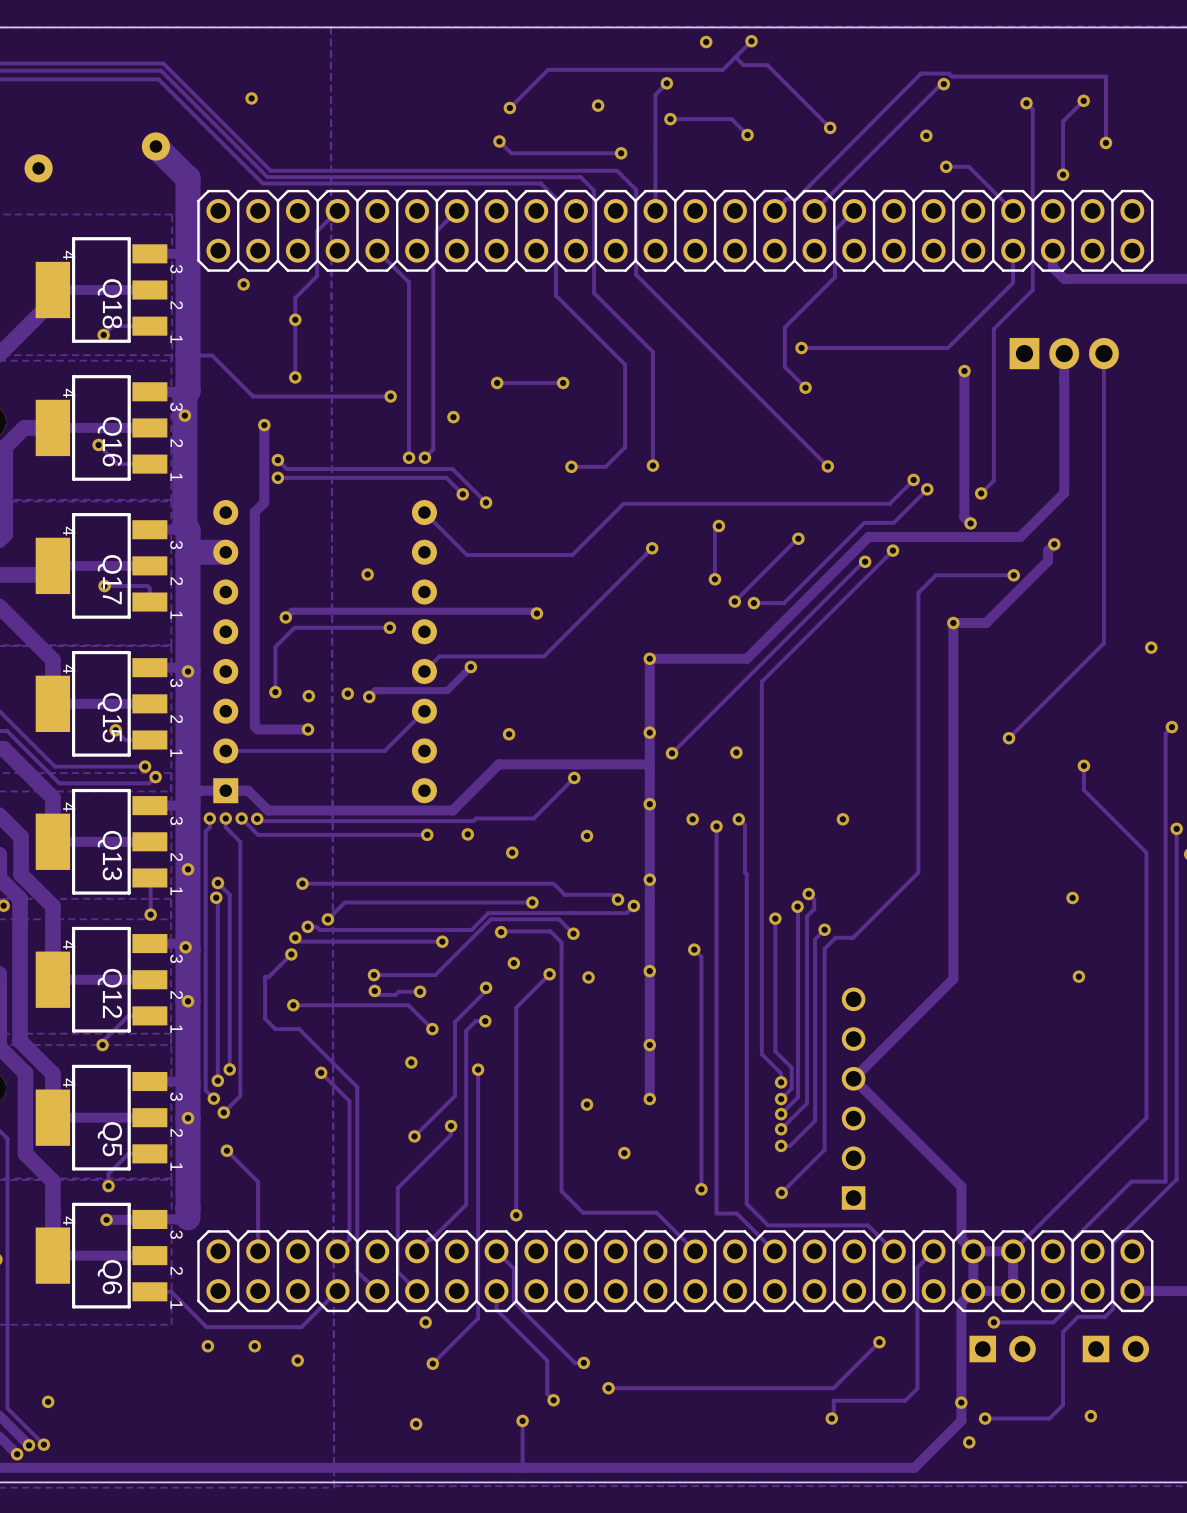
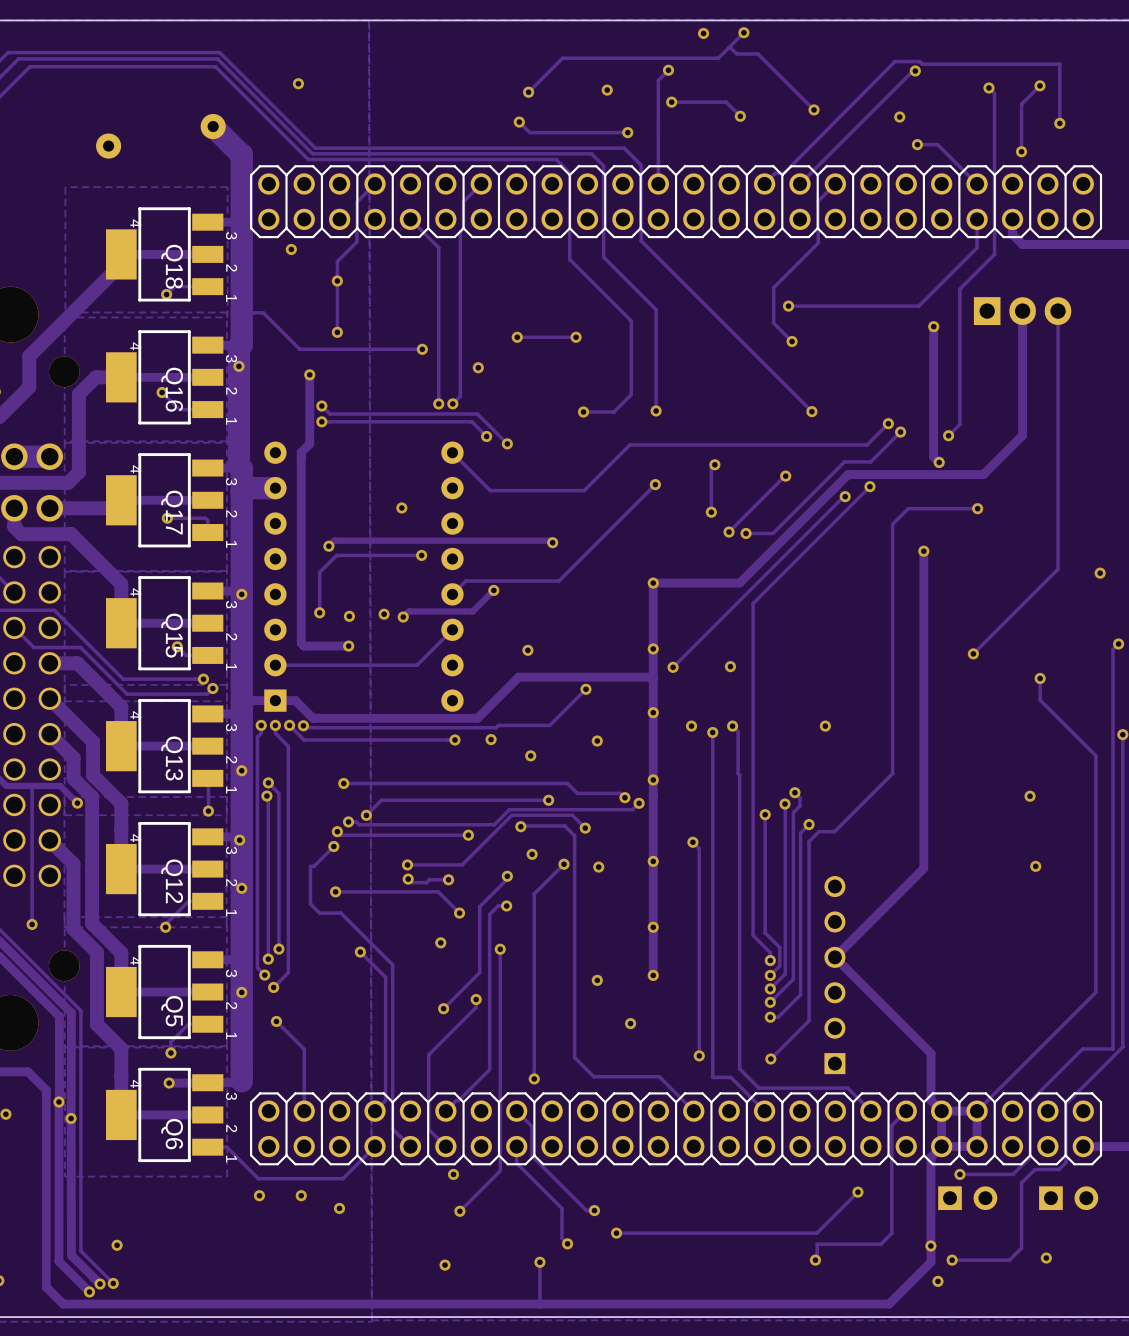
track: (1054, 544) (1048, 550) (1048, 561) (986, 623) (953, 623) -> none
via: (1054, 544) -> none

